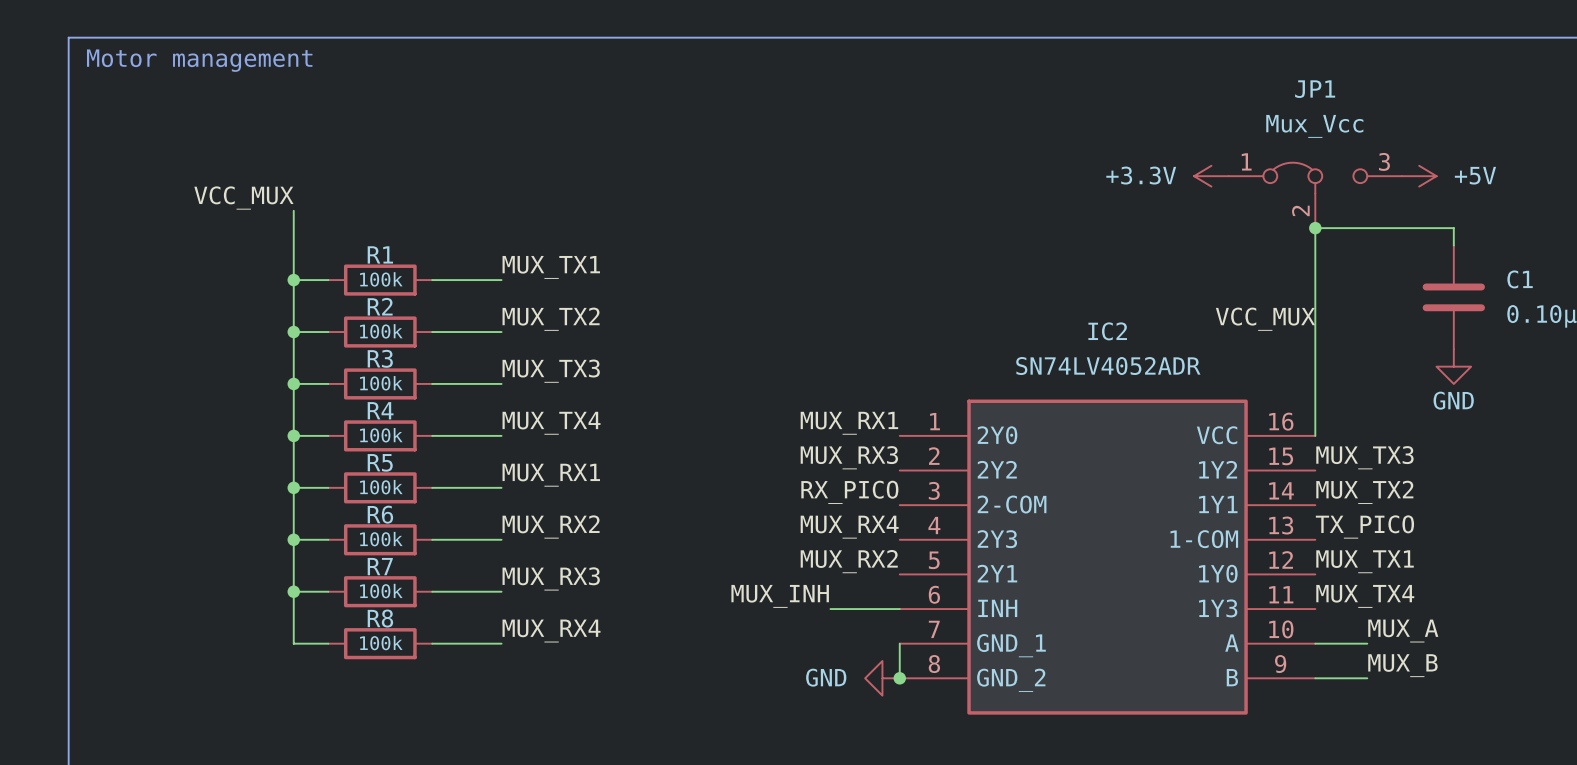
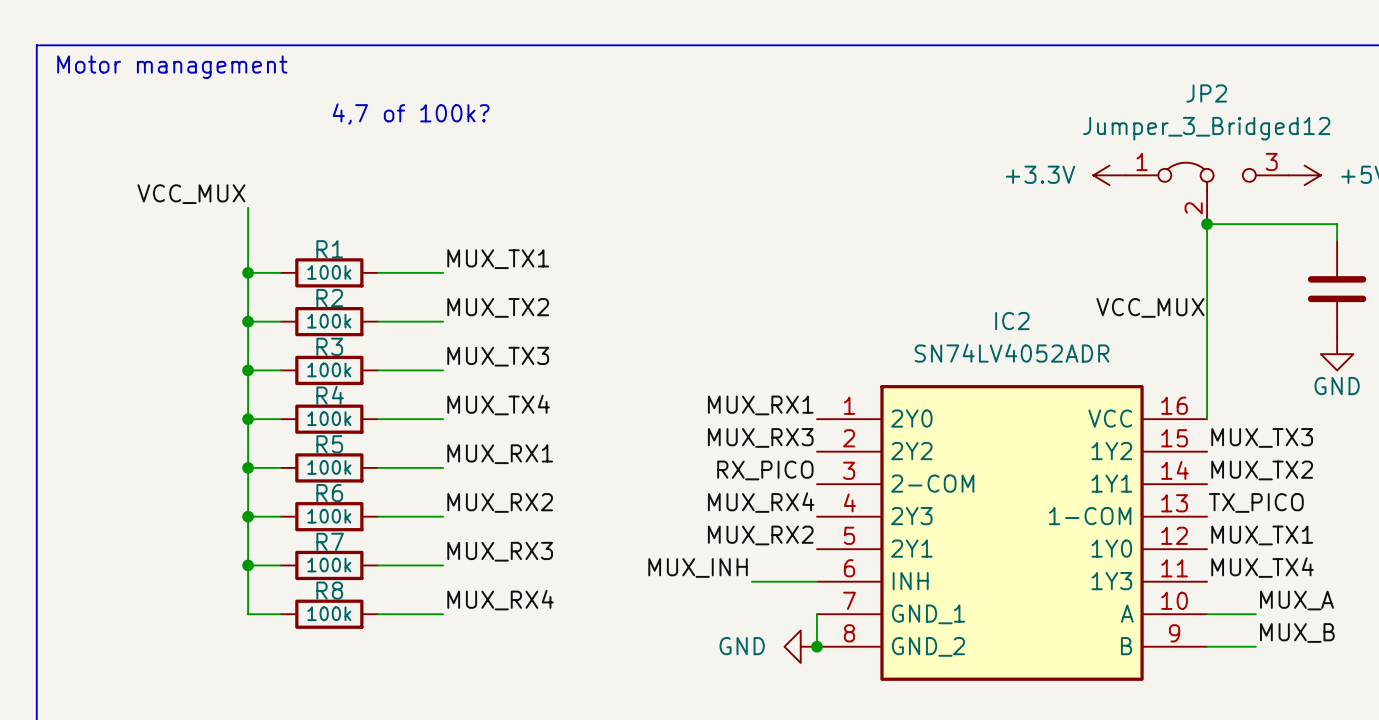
JP1 name: JP1 (1315, 89) -> JP2 (1206, 93)
text: none -> 4,7 of 100k? (411, 114)
JP1 value: Mux_Vcc (1314, 126) -> Jumper_3_Bridged12 (1206, 128)

